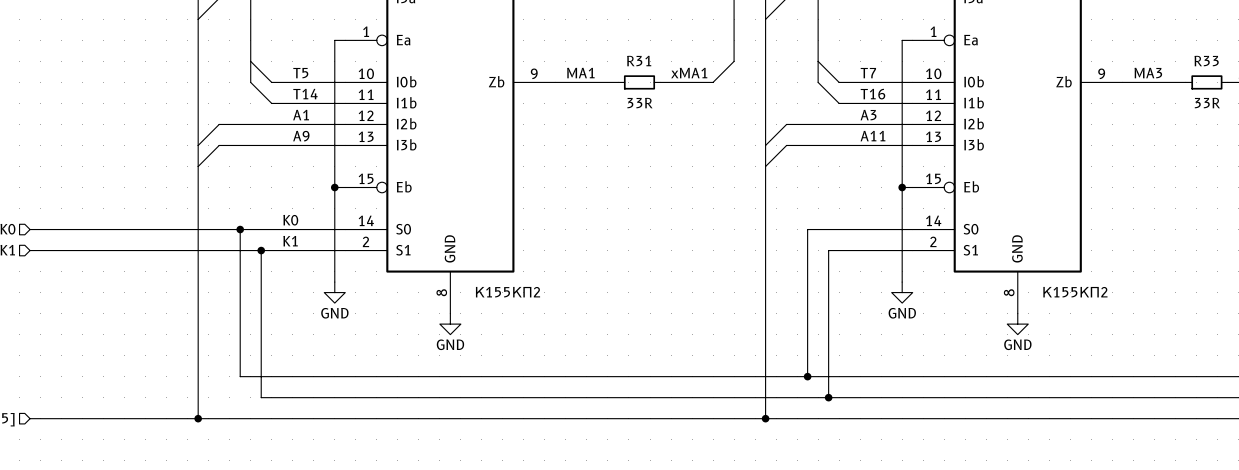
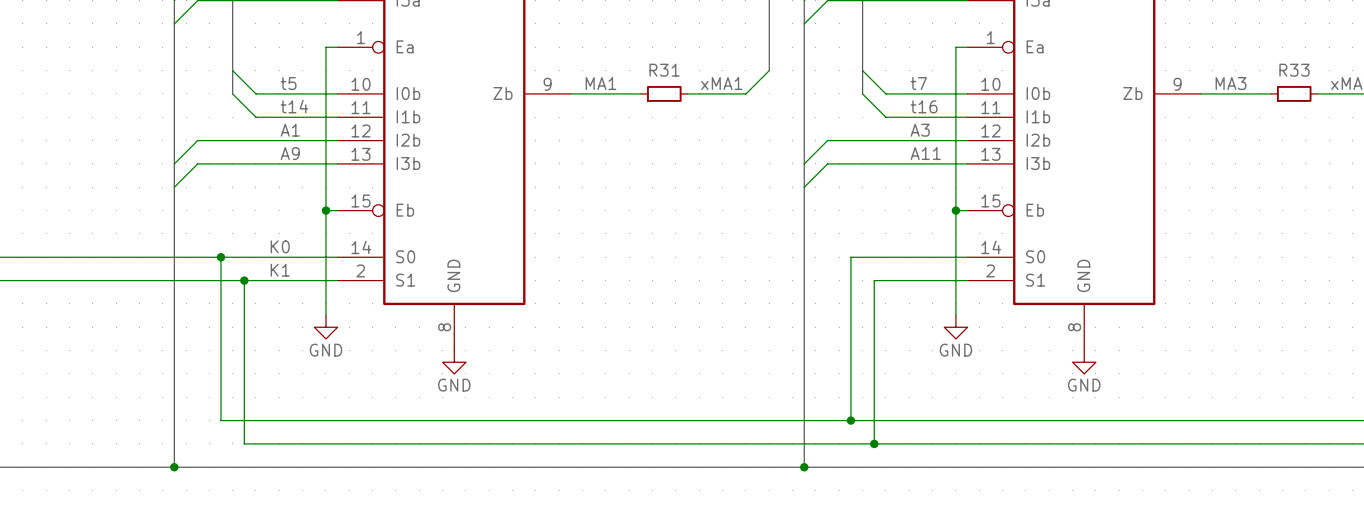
label: T5 (300, 73) -> t5 (288, 83)
label: T7 (868, 73) -> t7 (918, 83)
label: T14 (305, 94) -> t14 (294, 106)
label: T16 (872, 94) -> t16 (924, 106)
R31 value: 33R (639, 103) -> none
R33 value: 33R (1207, 103) -> none
part text: К155КП2 (508, 292) -> none
part text: К155КП2 (1075, 292) -> none

